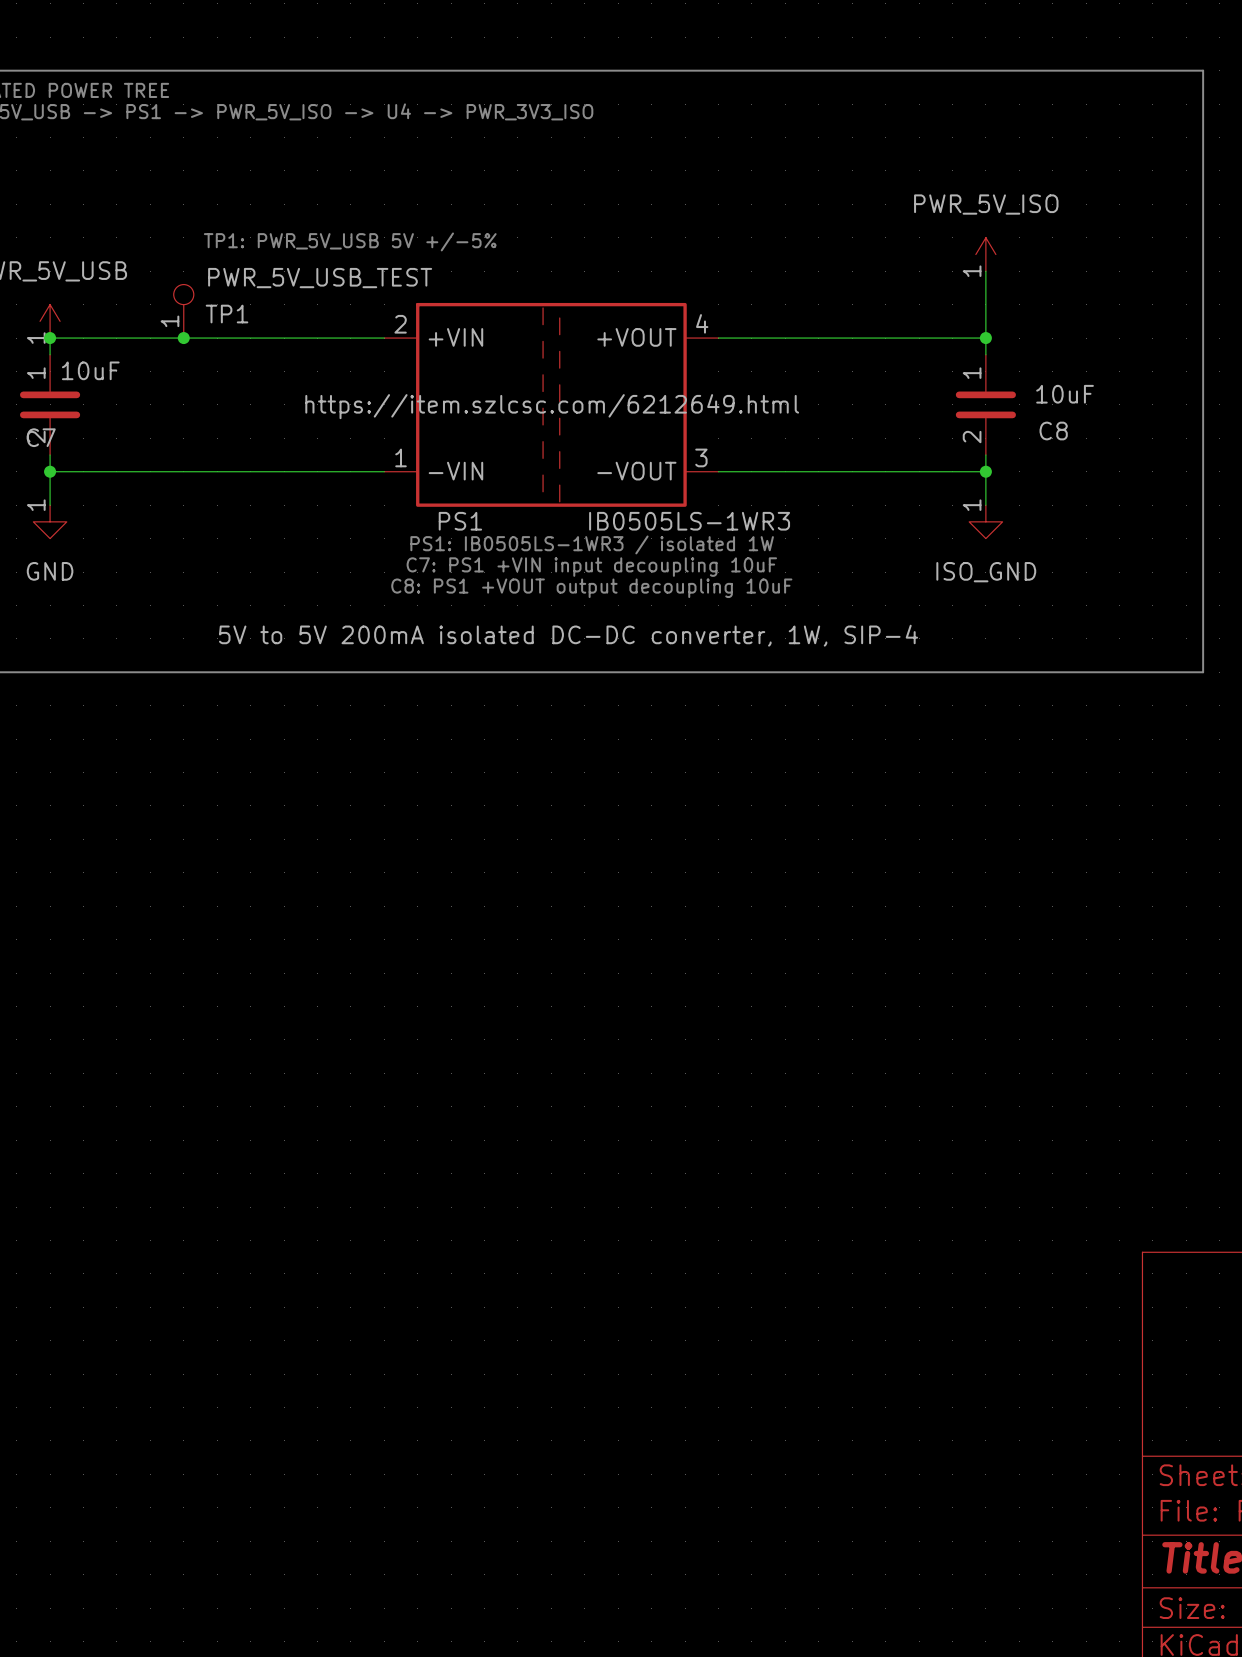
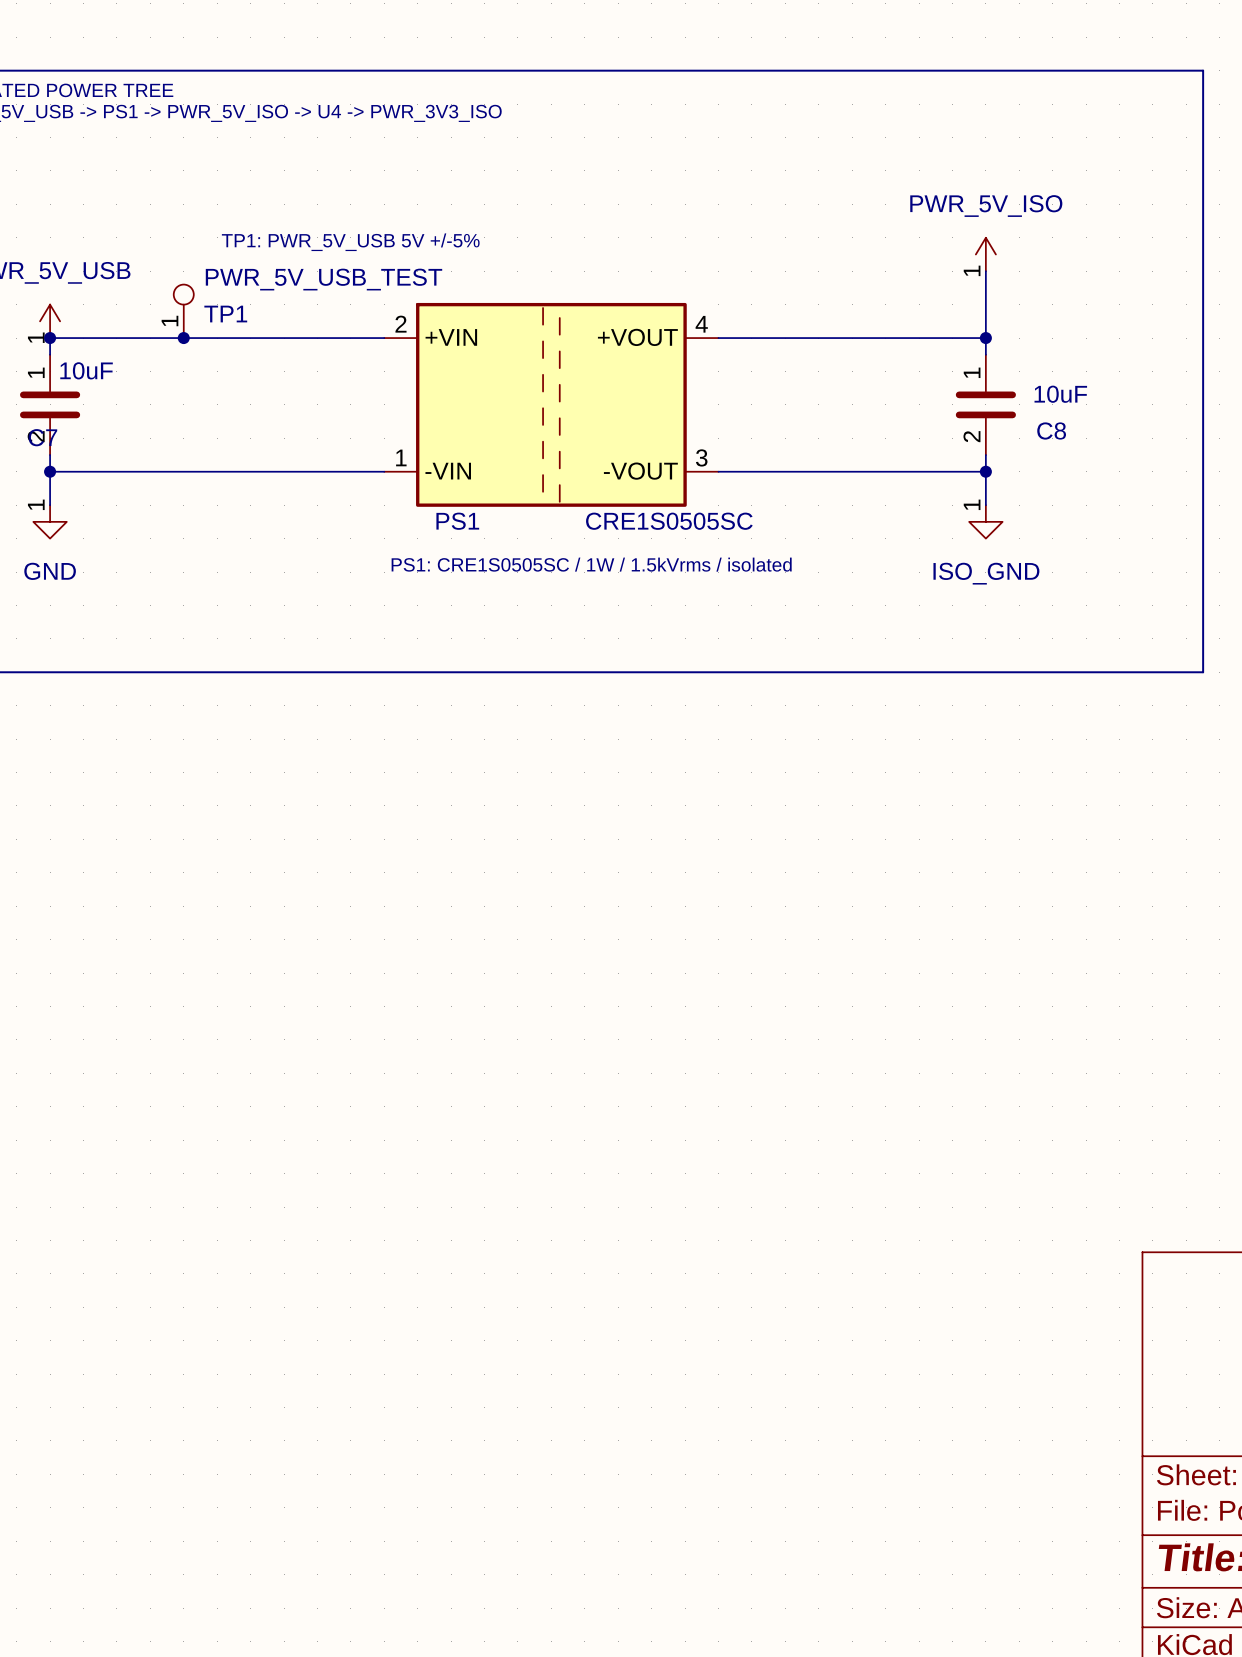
PS1 text: https://item.szlcsc.com/6212649.html (552, 406) -> none
PS1 value: IB0505LS-1WR3 (689, 521) -> CRE1S0505SC (669, 521)
text: PS1: IB0505LS-1WR3 / isolated 1W (592, 544) -> none
text: C7: PS1 +VIN input decoupling 10uF (591, 567) -> PS1: CRE1S0505SC / 1W / 1.5kVrms / isolated (591, 564)
text: C8: PS1 +VOUT output decoupling 10uF (591, 588) -> none
PS1 text: 5V to 5V 200mA isolated DC-DC converter, 1W, SIP-4 (568, 635) -> none

